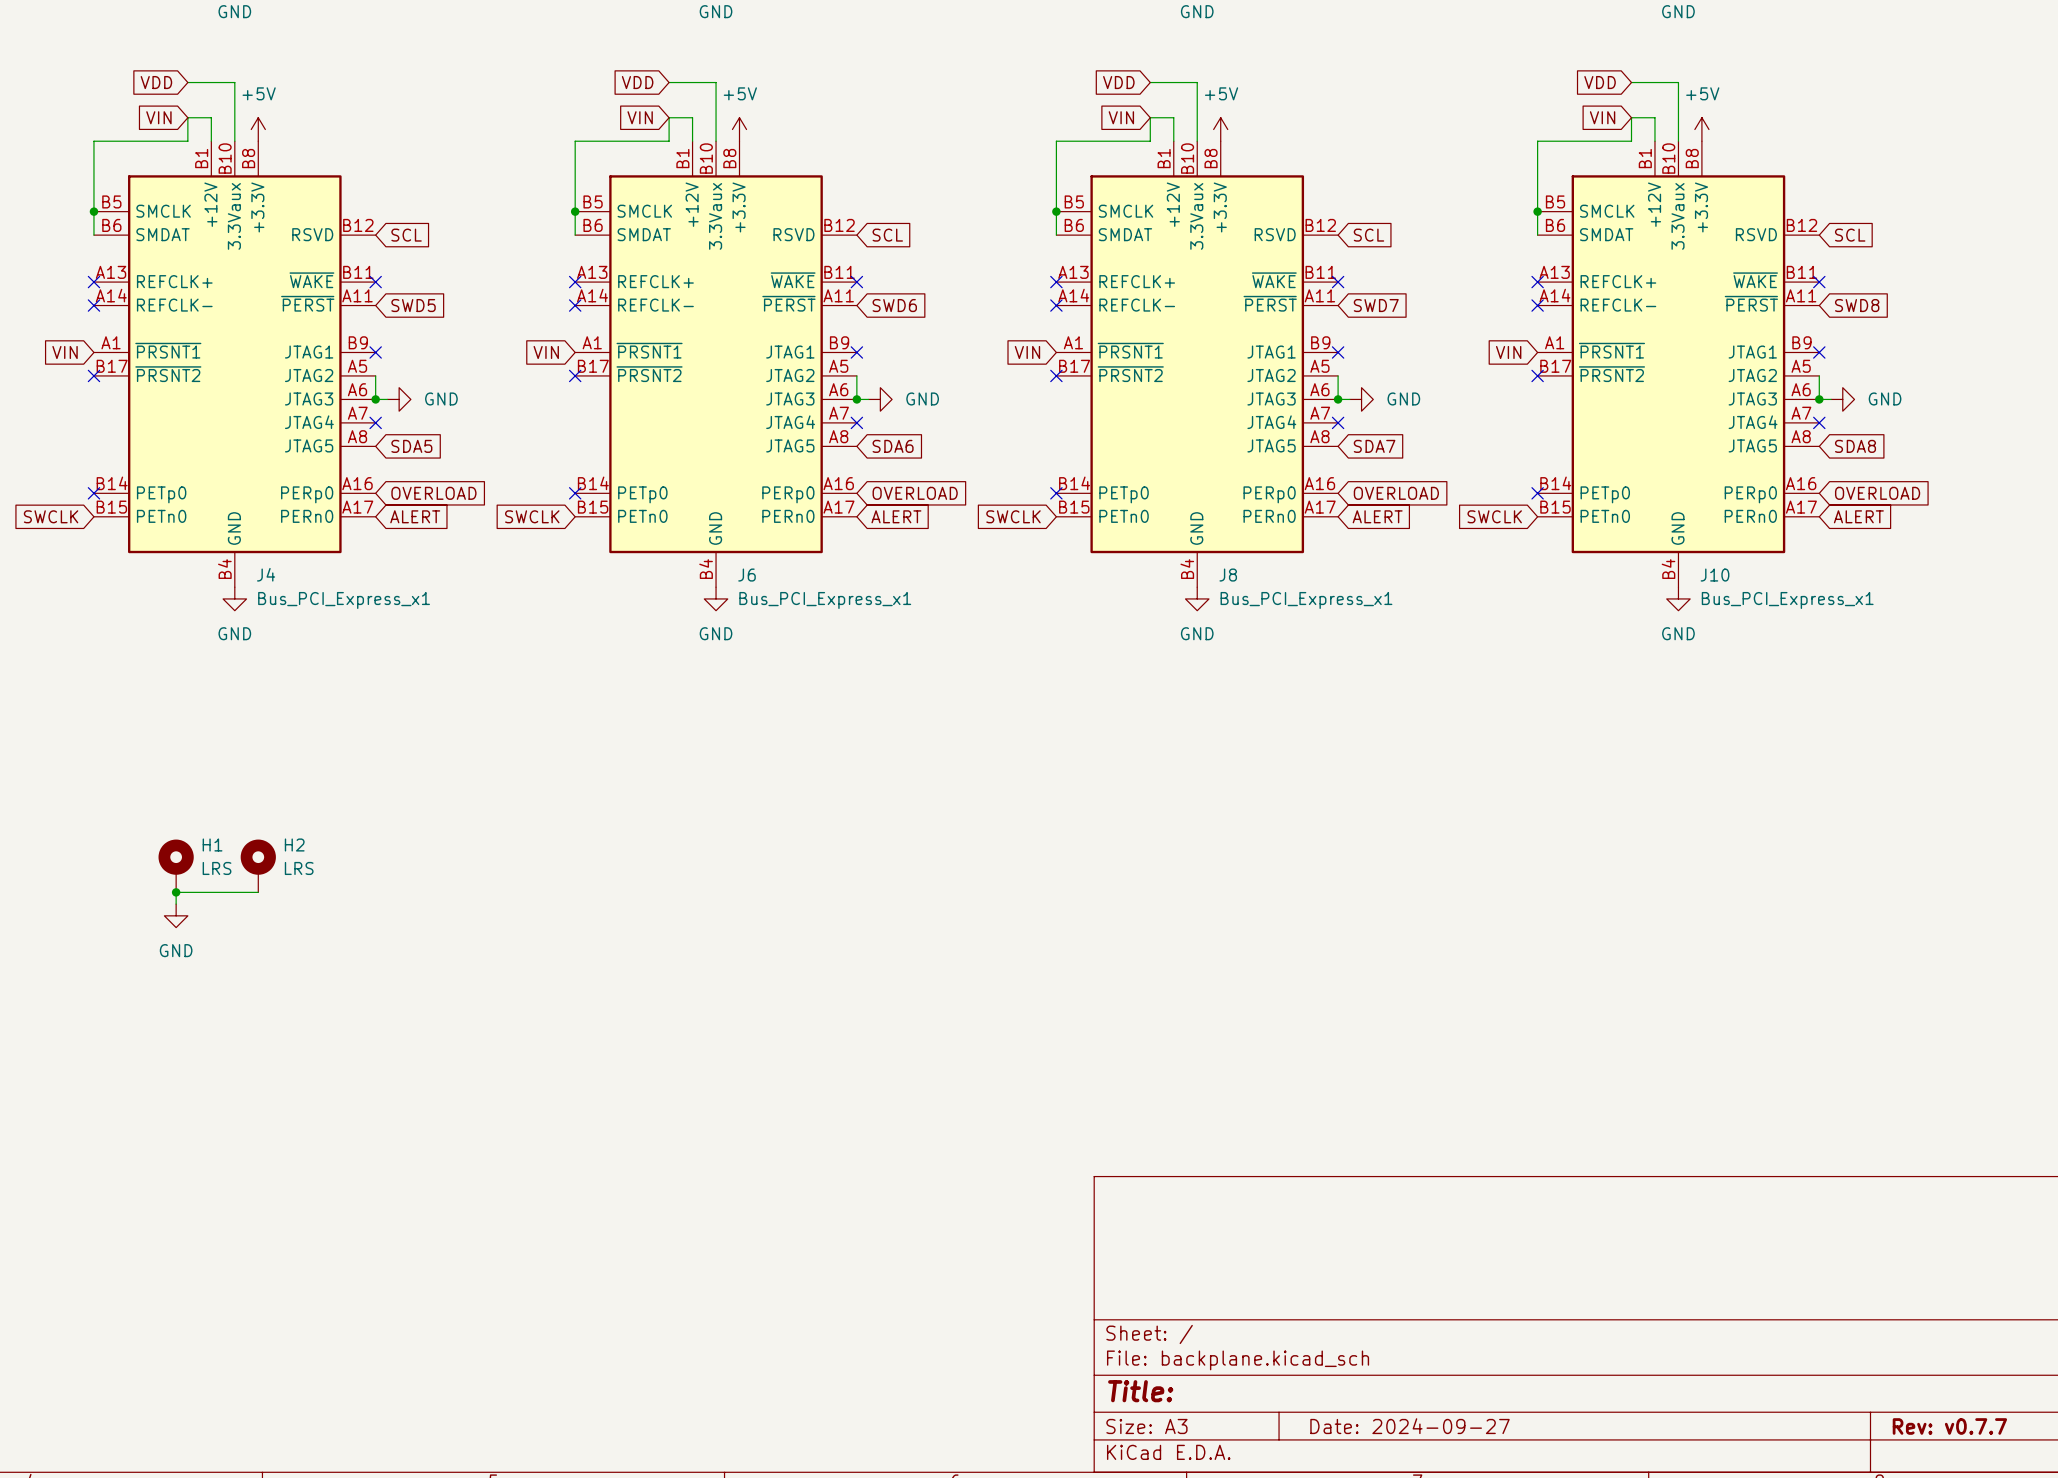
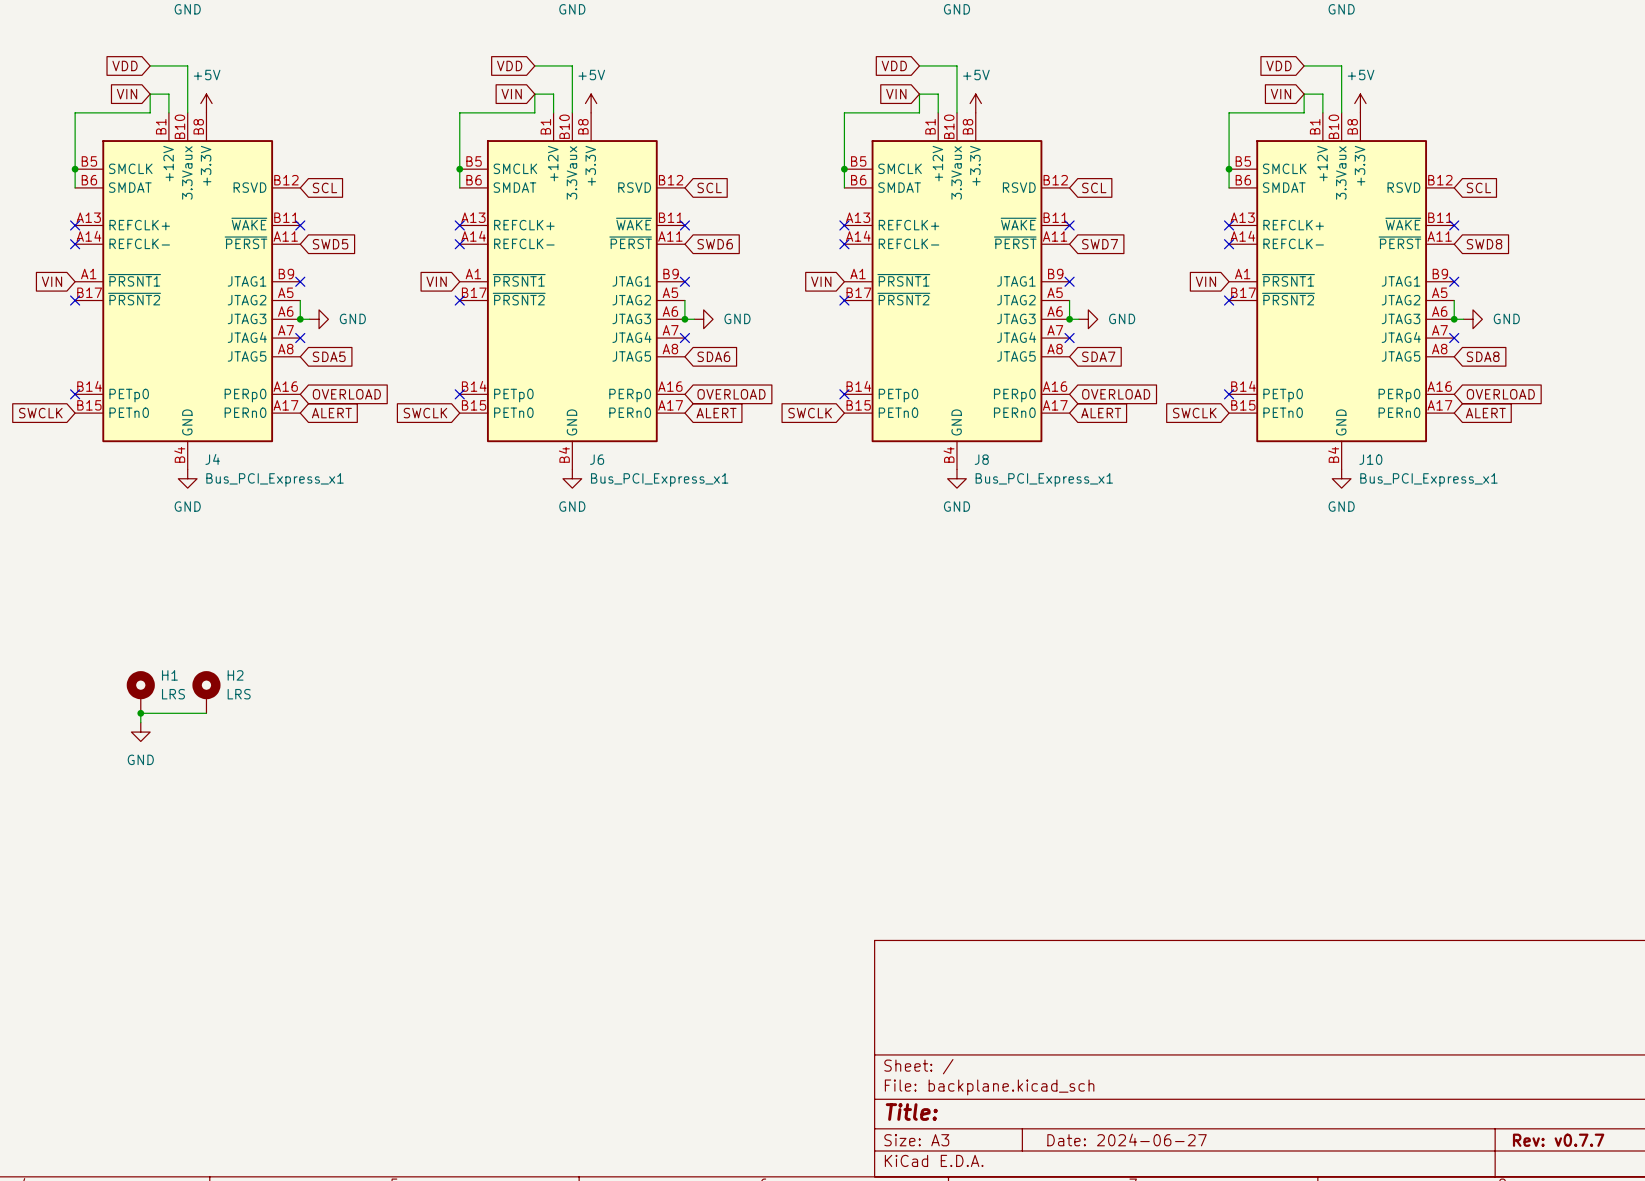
title block: Date: 2024-09-27 (1410, 1426) -> Date: 2024-06-27 (1127, 1139)

